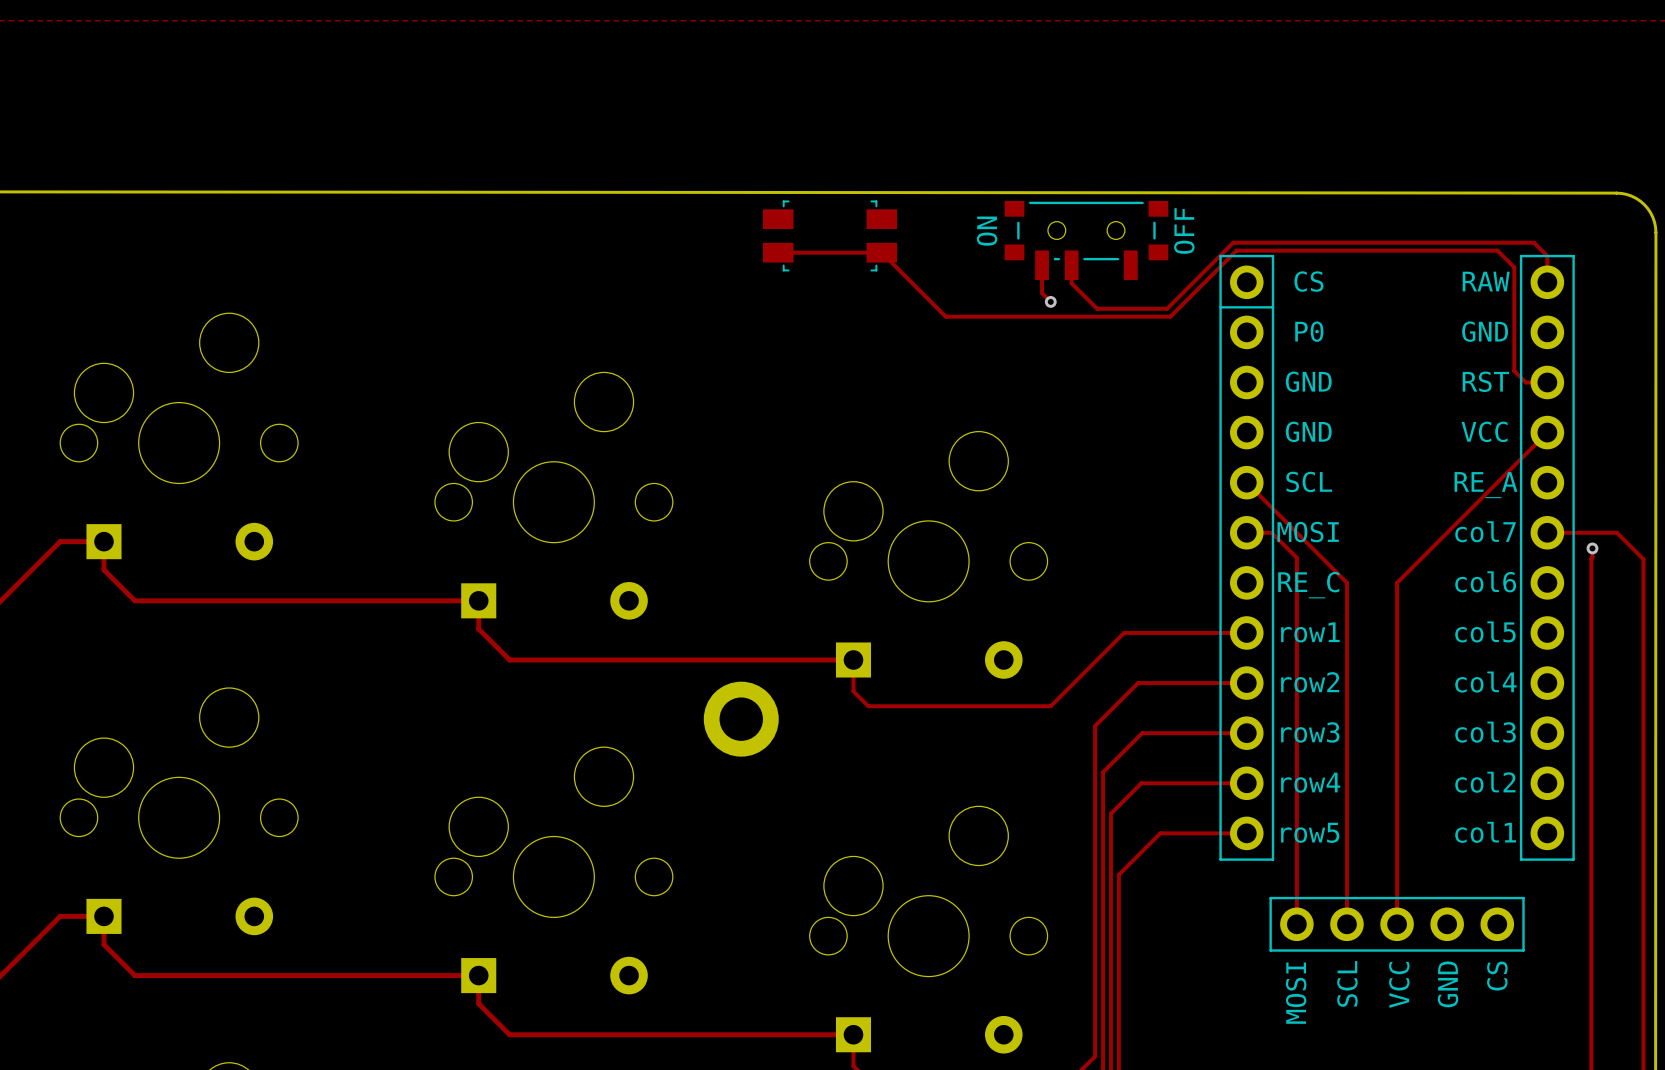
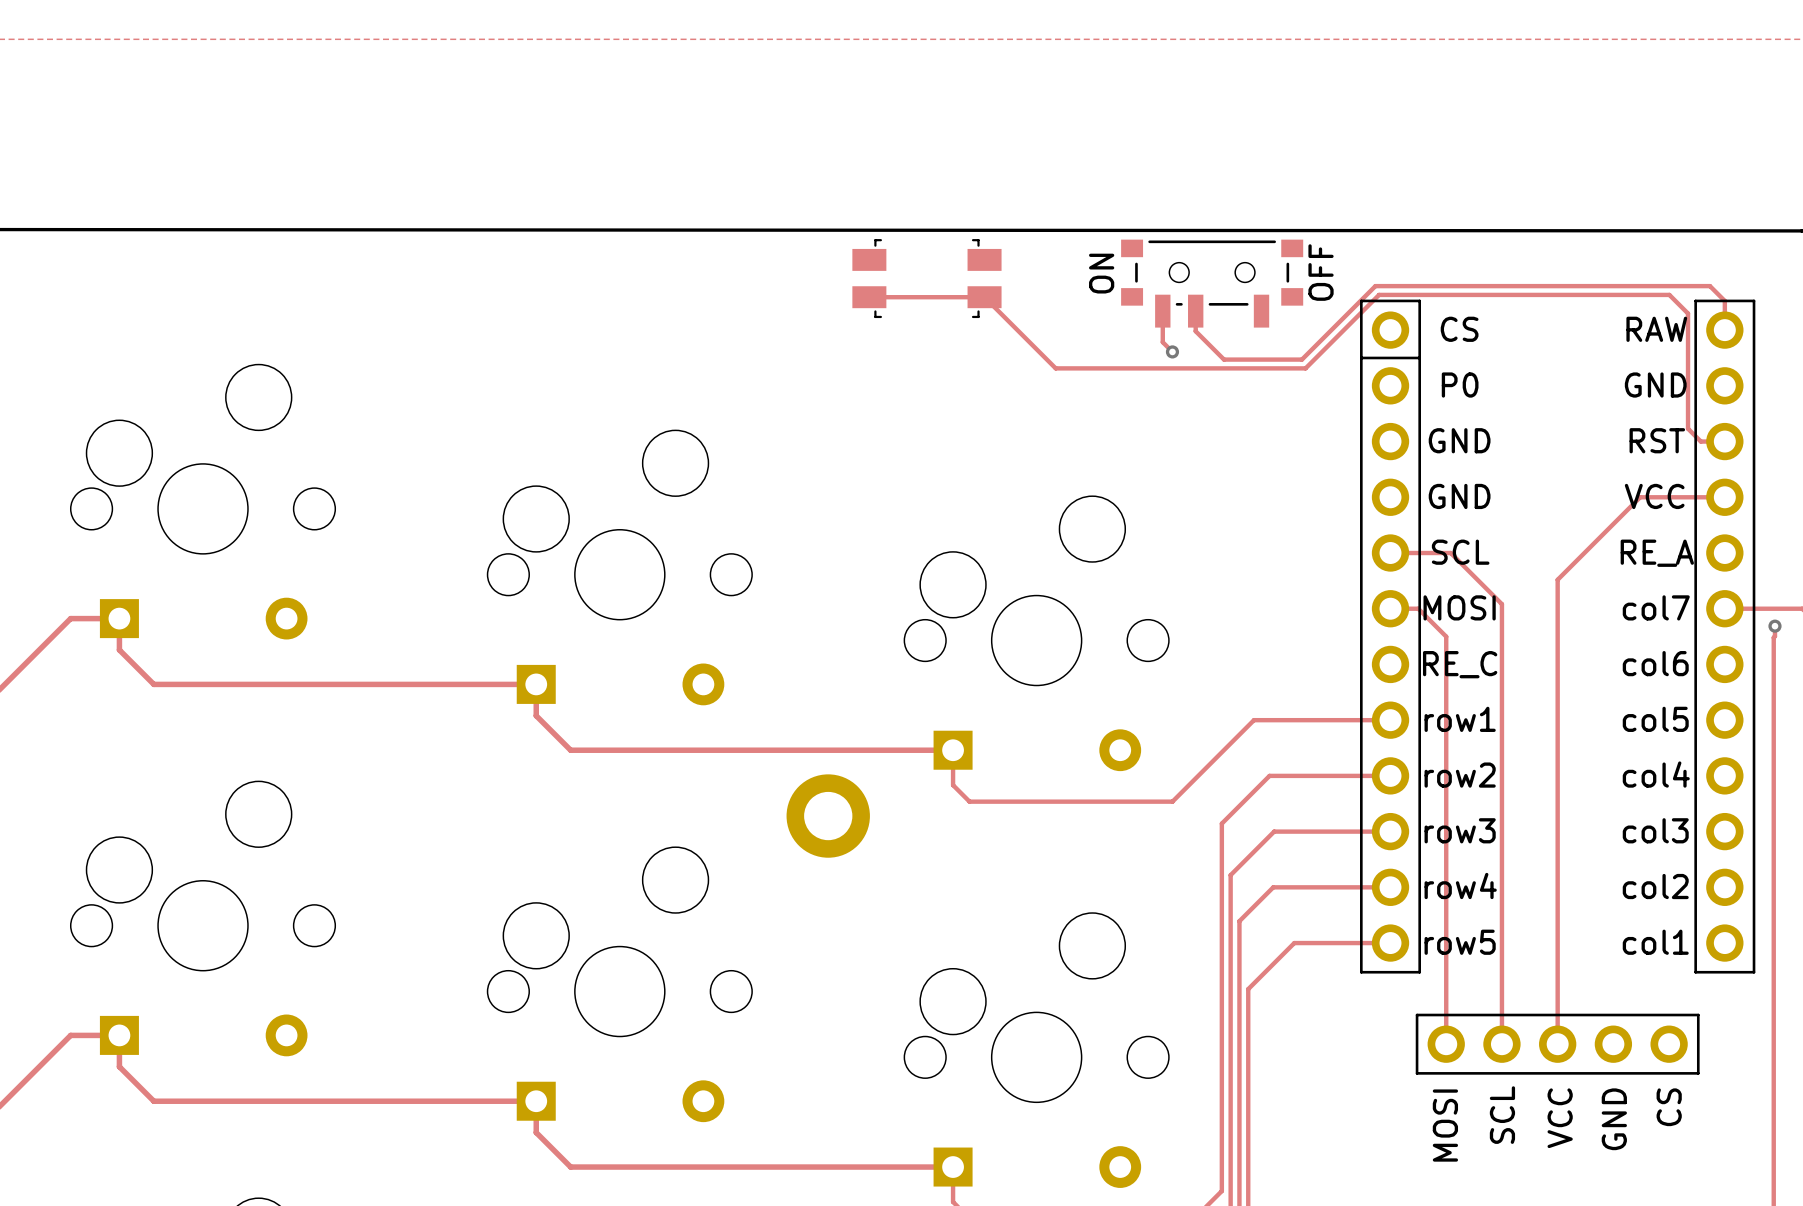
track: (1547, 432) (1397, 582) -> (1724, 497) (1640, 497) (1557, 579) (1557, 664)
track: (1246, 482) (1346, 582) -> (1390, 553) (1450, 553) (1501, 604) (1501, 664)

